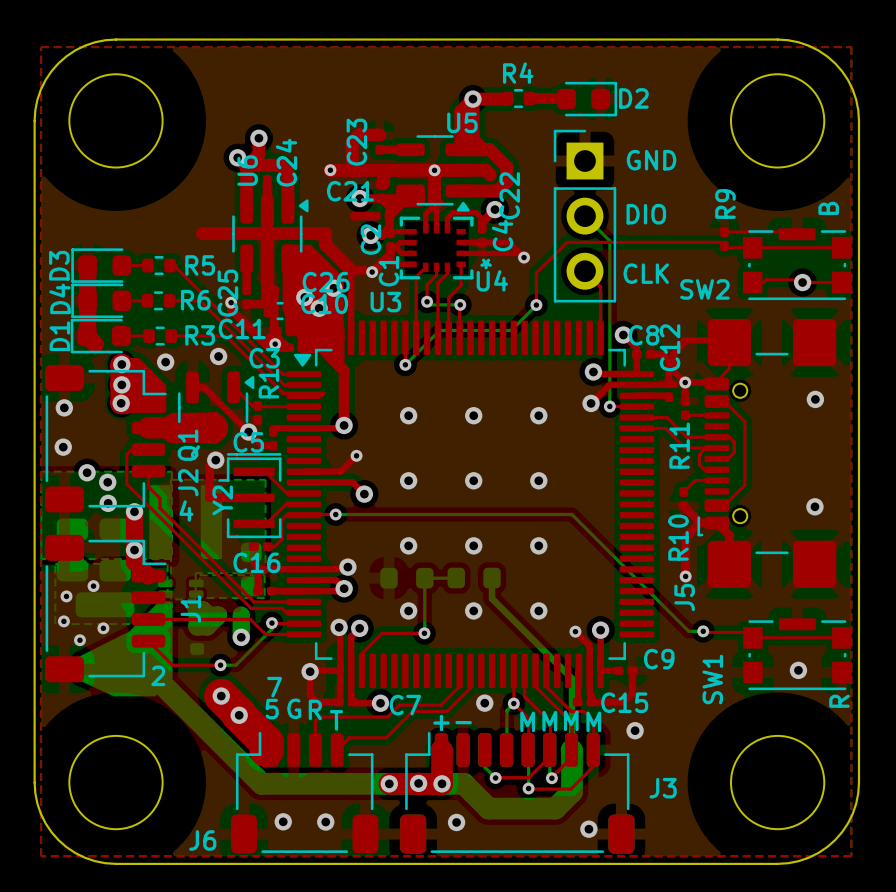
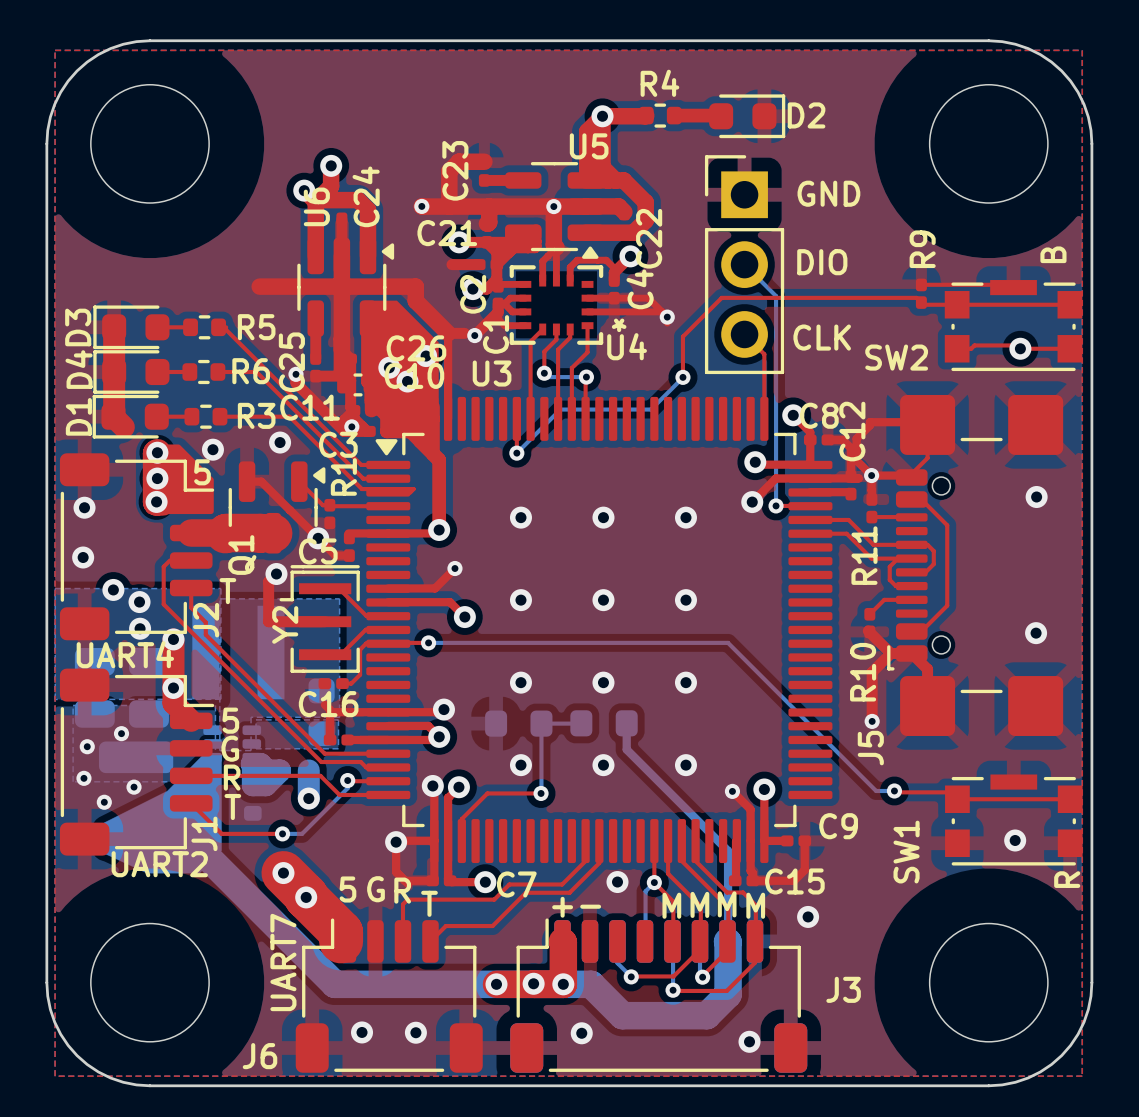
text: none -> 5 (202, 472)
text: none -> T (227, 591)
J2 name position: J2 (188, 482) -> J2 (206, 620)
text: 4 (186, 511) -> none
text: none -> UART4 (125, 654)
text: none -> 5 (230, 720)
text: none -> G (230, 748)
J1 name position: J1 (190, 608) -> J1 (204, 833)
text: none -> R (232, 777)
text: none -> T (232, 807)
text: 2 (158, 675) -> none
text: 7 (274, 687) -> none
text: none -> UART2 (159, 864)
text: none -> UART7 (283, 962)

